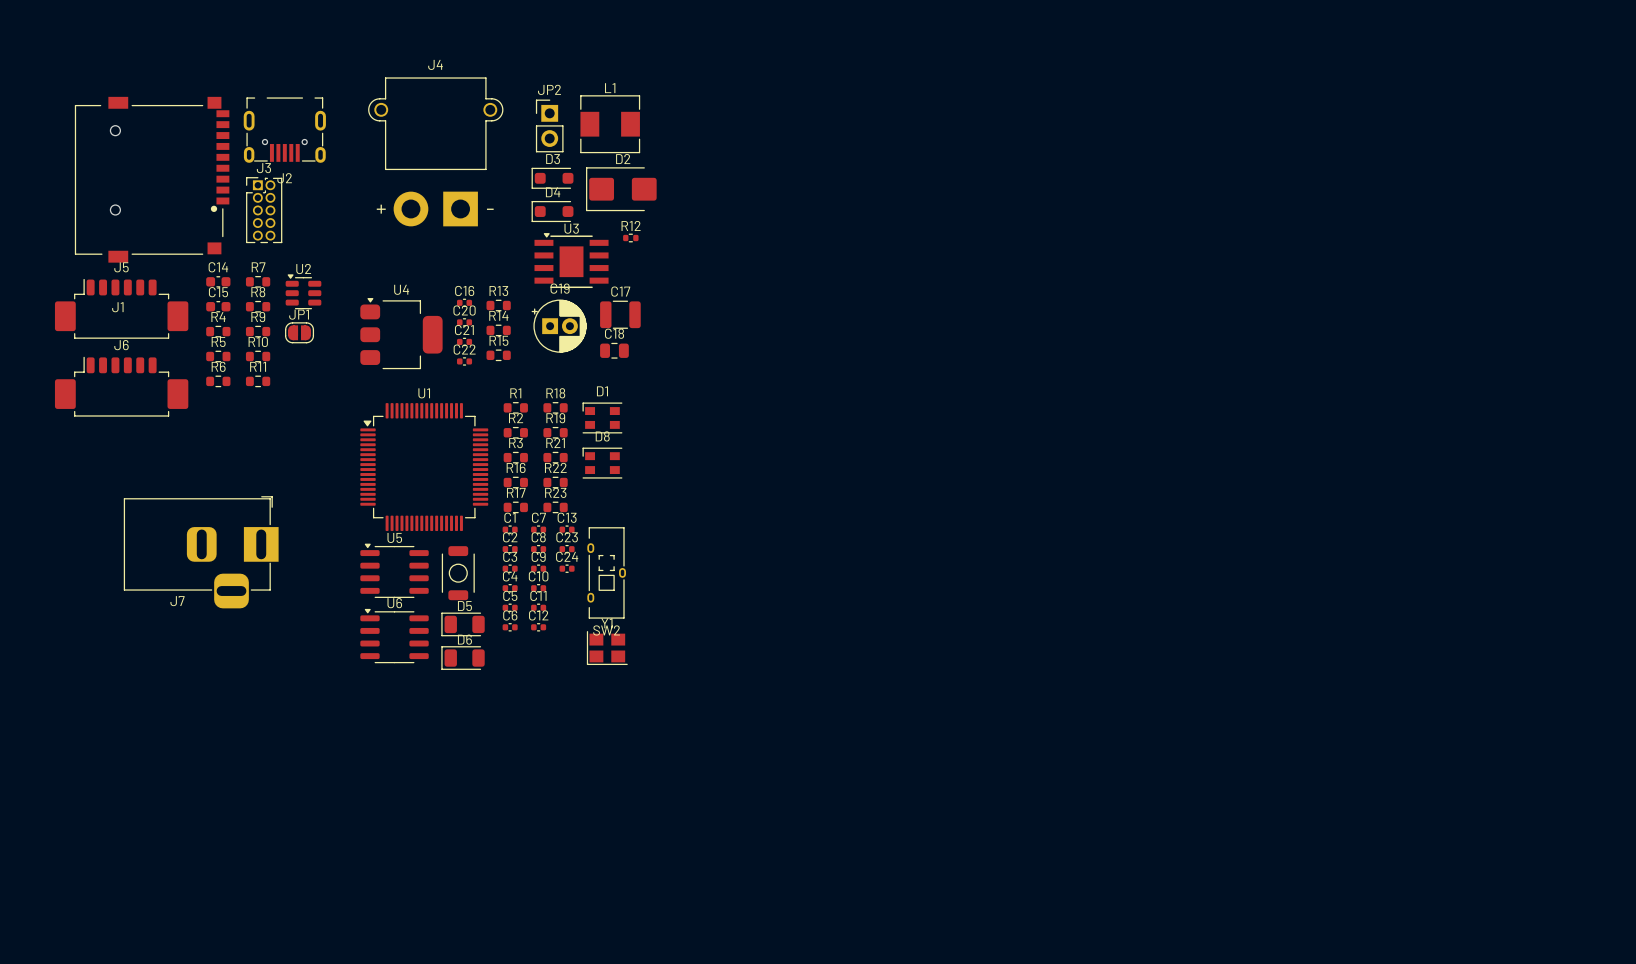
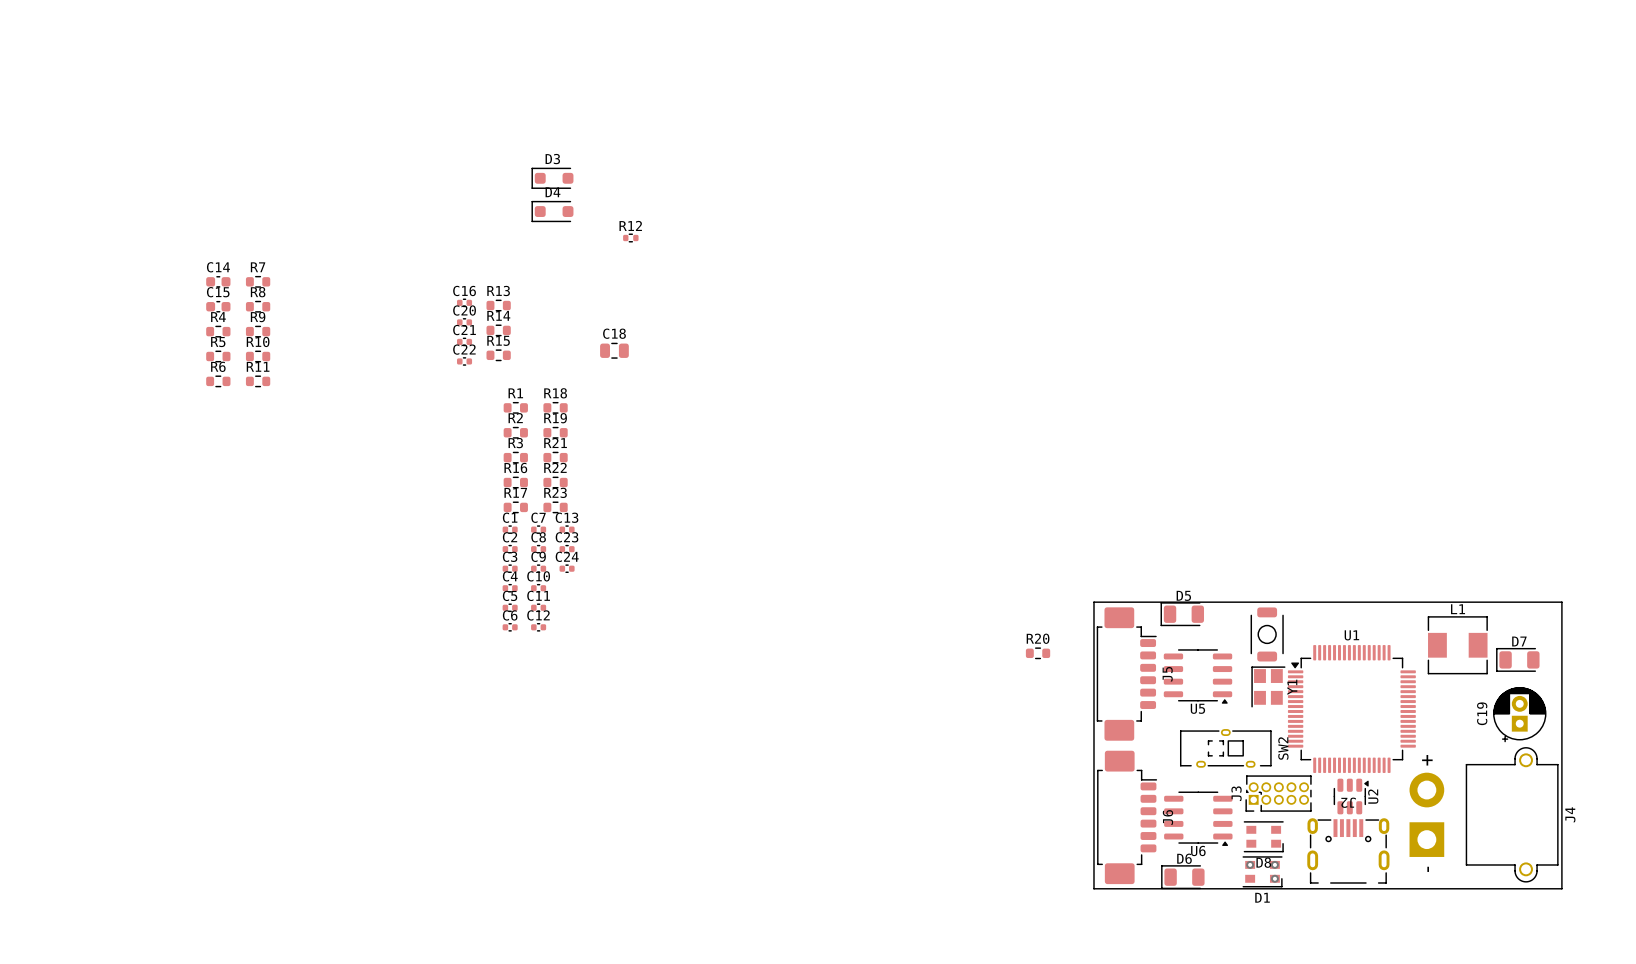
L1 position: (610, 124) -> (1457, 645)
JP2: (549, 125) -> none
J2 rotation: 0° (284, 130) -> 180° (1348, 850)
J2 position: (284, 130) -> (1348, 850)
J4 rotation: 0° (435, 151) -> 90° clockwise (1483, 814)
J4 position: (435, 151) -> (1483, 814)
J1: (152, 179) -> none
D2: (621, 189) -> none
J3 rotation: 0° (264, 210) -> 90° counterclockwise (1278, 793)
J3 position: (264, 210) -> (1278, 793)
U3: (571, 260) -> none
U2 rotation: 0° (303, 291) -> 90° clockwise (1351, 796)
U2 position: (303, 291) -> (1351, 796)
J5 rotation: 0° (121, 308) -> 90° clockwise (1126, 674)
J5 position: (121, 308) -> (1126, 674)
C17: (620, 314) -> none
C19 rotation: 0° (559, 326) -> 90° counterclockwise (1519, 714)
C19 position: (559, 326) -> (1519, 714)
JP1: (299, 332) -> none
U4: (401, 333) -> none
J6 rotation: 0° (121, 386) -> 90° clockwise (1127, 817)
J6 position: (121, 386) -> (1127, 817)
D1 rotation: 0° (602, 417) -> 180° (1262, 871)
D1 position: (602, 417) -> (1262, 871)
D8 rotation: 0° (602, 463) -> 180° (1263, 836)
D8 position: (602, 463) -> (1263, 836)
U1 position: (424, 467) -> (1351, 709)
J7: (201, 552) -> none
U5 rotation: 0° (394, 570) -> 180° (1197, 676)
U5 position: (394, 570) -> (1197, 676)
SW2 rotation: 0° (606, 572) -> 90° counterclockwise (1225, 748)
SW2 position: (606, 572) -> (1225, 748)
part: (458, 573) -> none
board edge: none -> (1093, 602) (1561, 602) (1561, 888) (1093, 888) (1093, 602)
D5 position: (463, 624) -> (1182, 614)
part: none -> (1267, 634)
U6 rotation: 0° (394, 636) -> 180° (1198, 818)
U6 position: (394, 636) -> (1198, 818)
Y1 rotation: 0° (607, 648) -> 90° clockwise (1268, 686)
Y1 position: (607, 648) -> (1268, 686)
R20: none -> (1038, 653)
D6 position: (463, 658) -> (1182, 877)
D7: none -> (1517, 659)
via: none -> (1250, 864)
via: none -> (1274, 864)
via: none -> (1274, 878)

